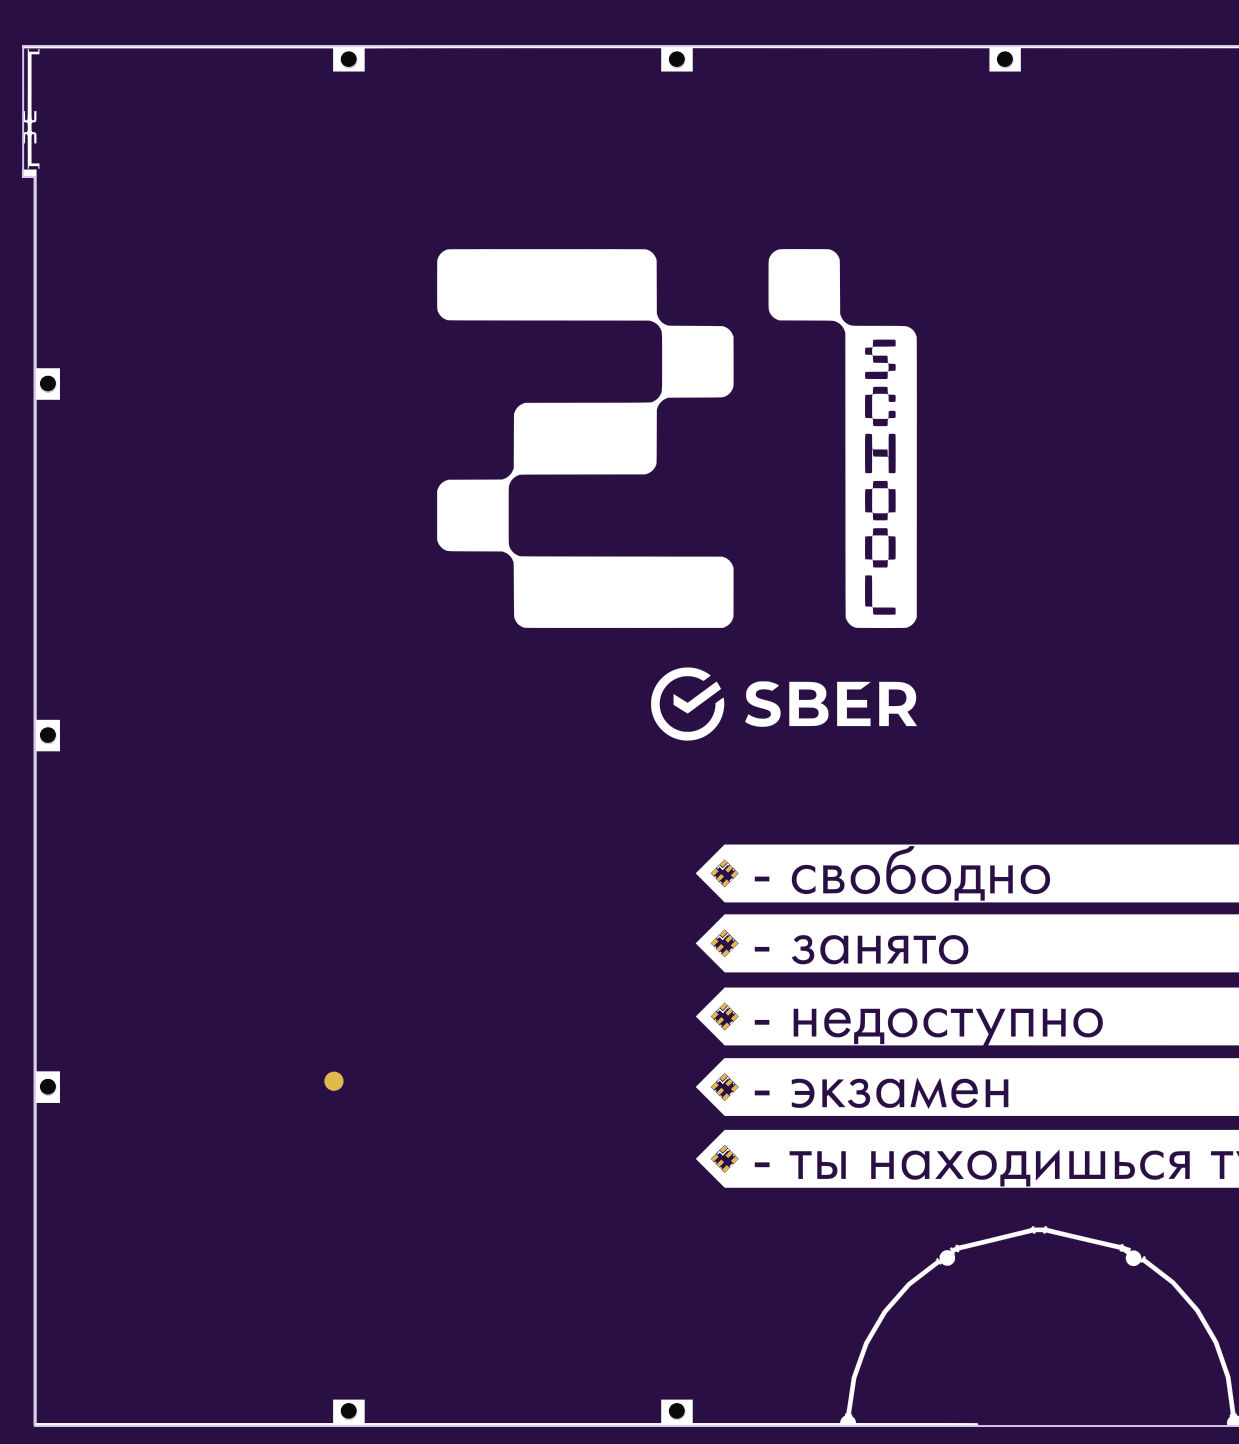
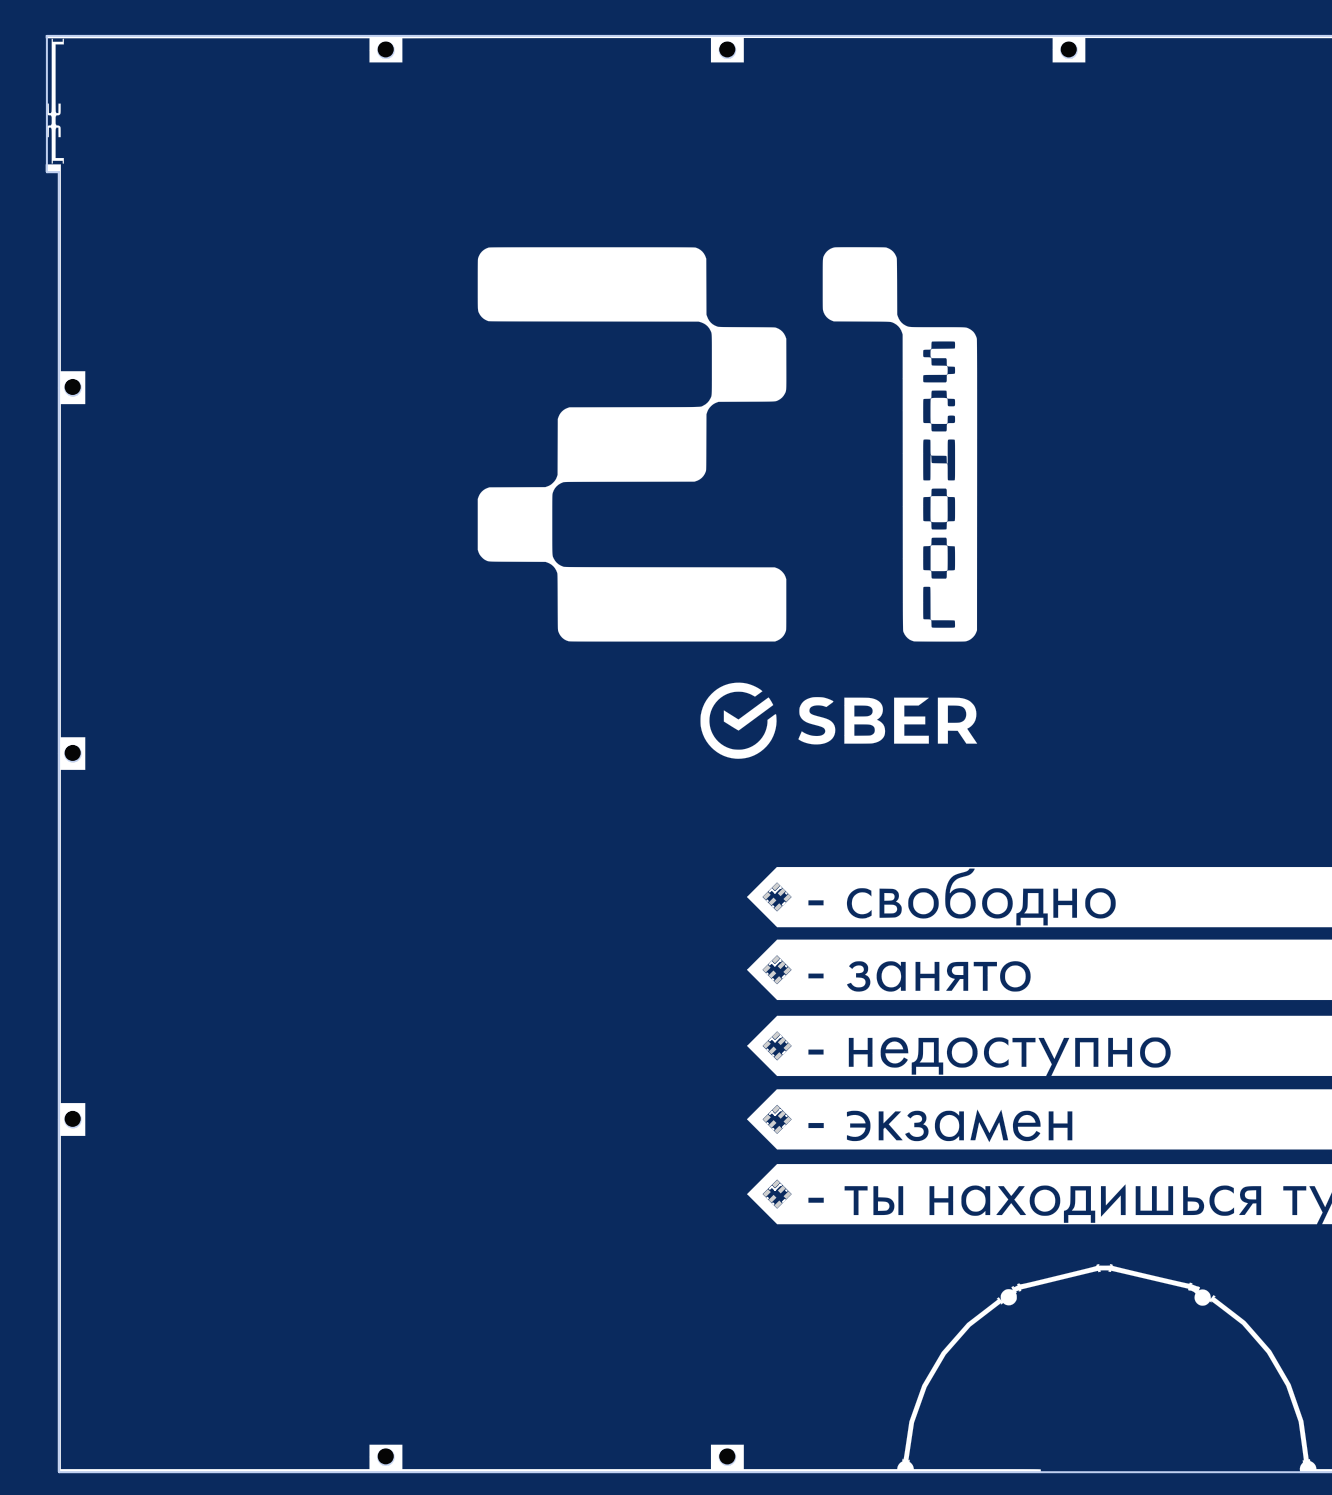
part: (333, 1081) -> none

